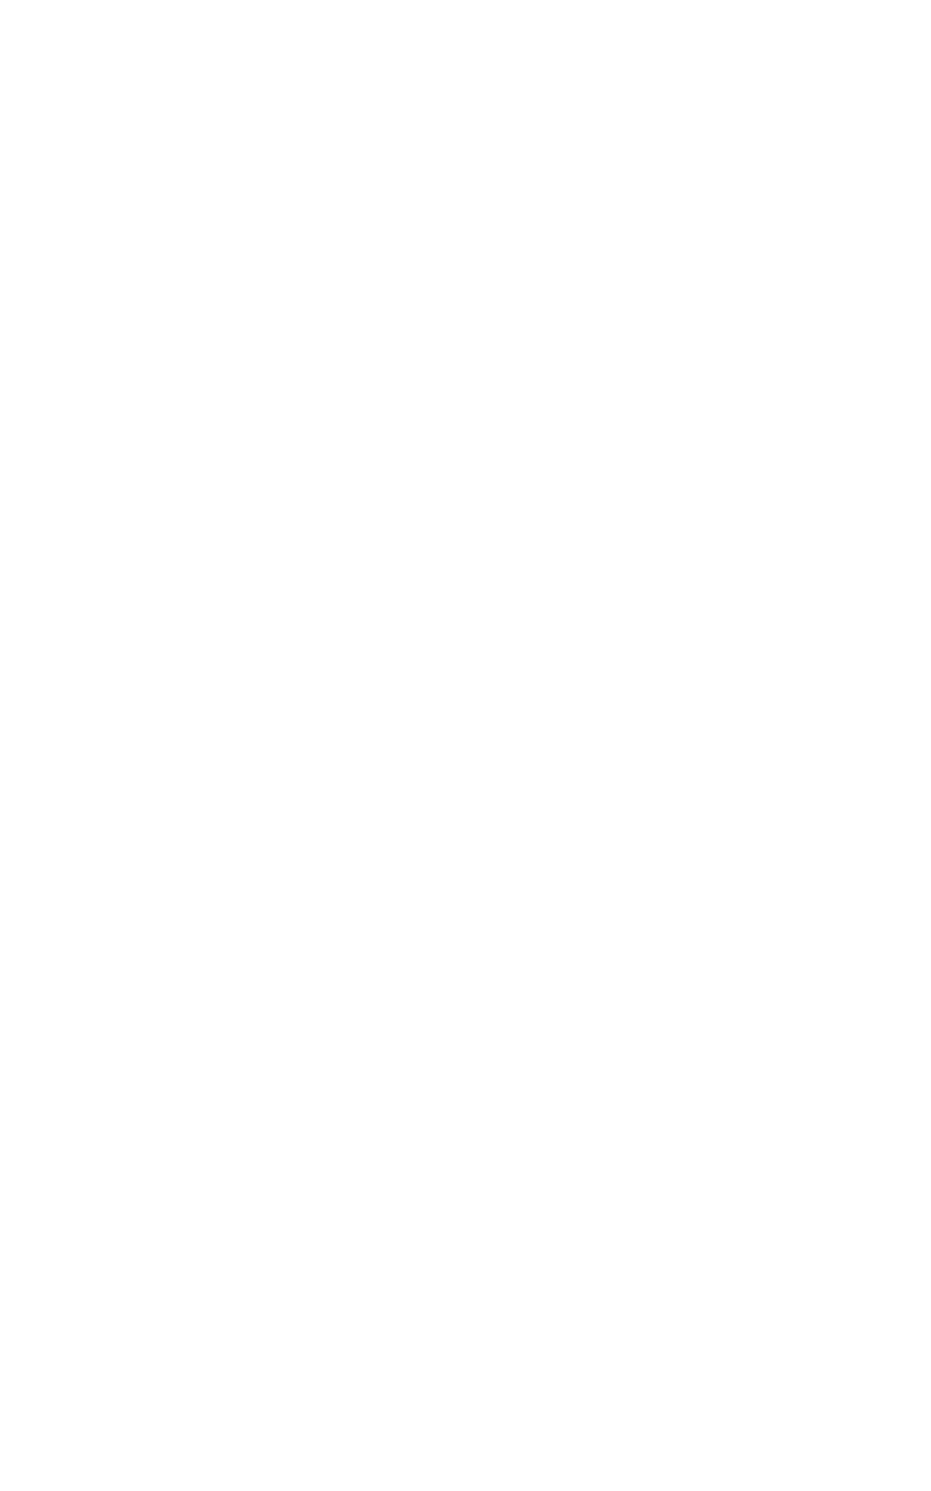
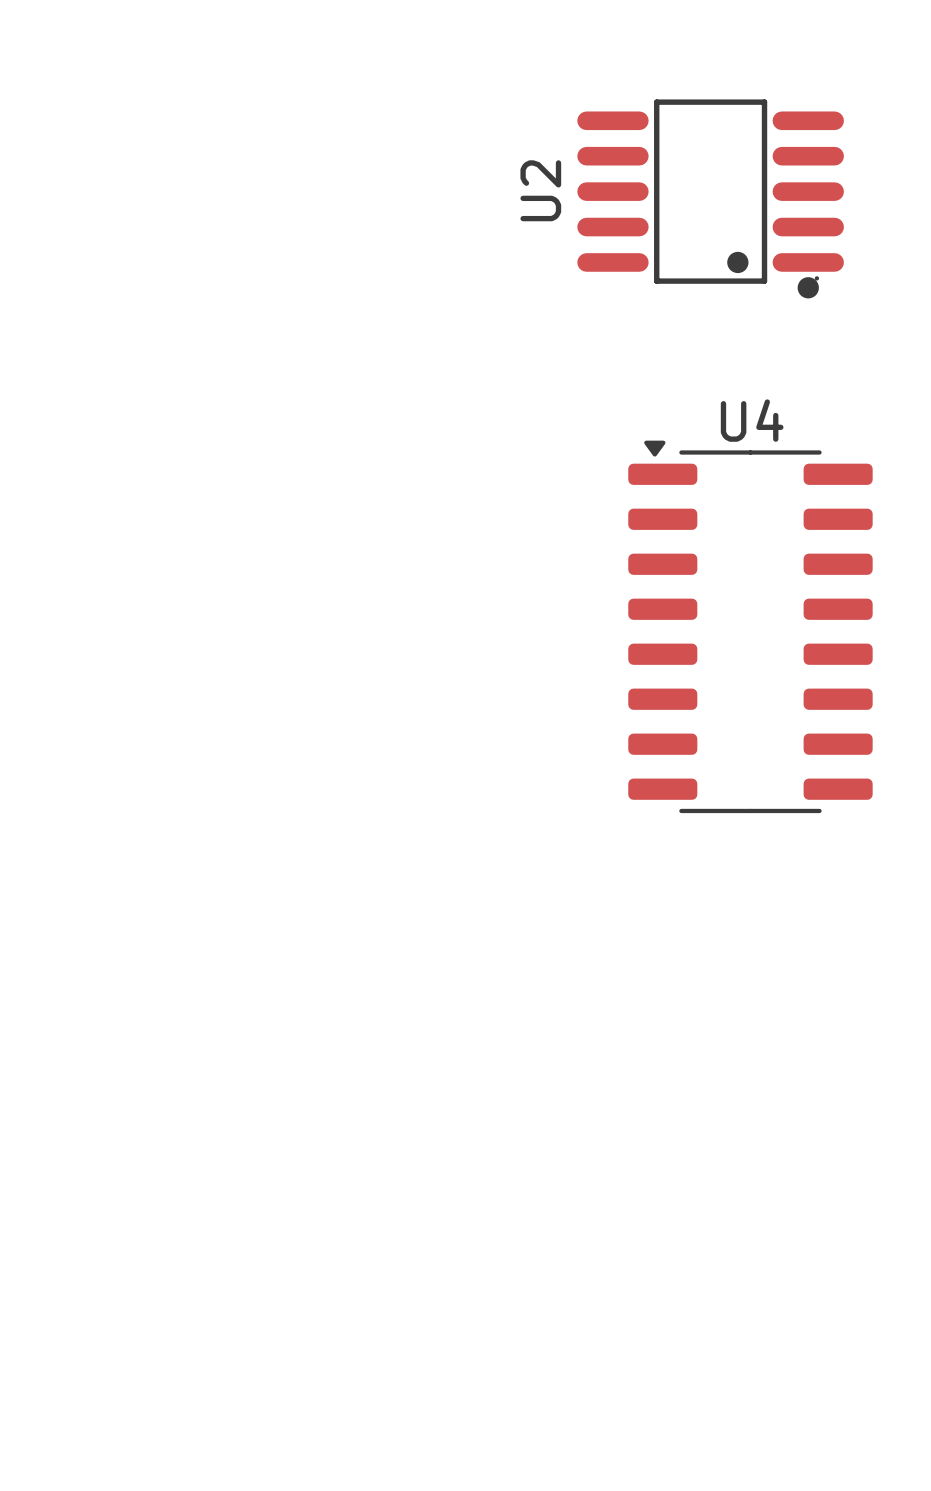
U2: none -> (710, 198)
U4: none -> (750, 626)

